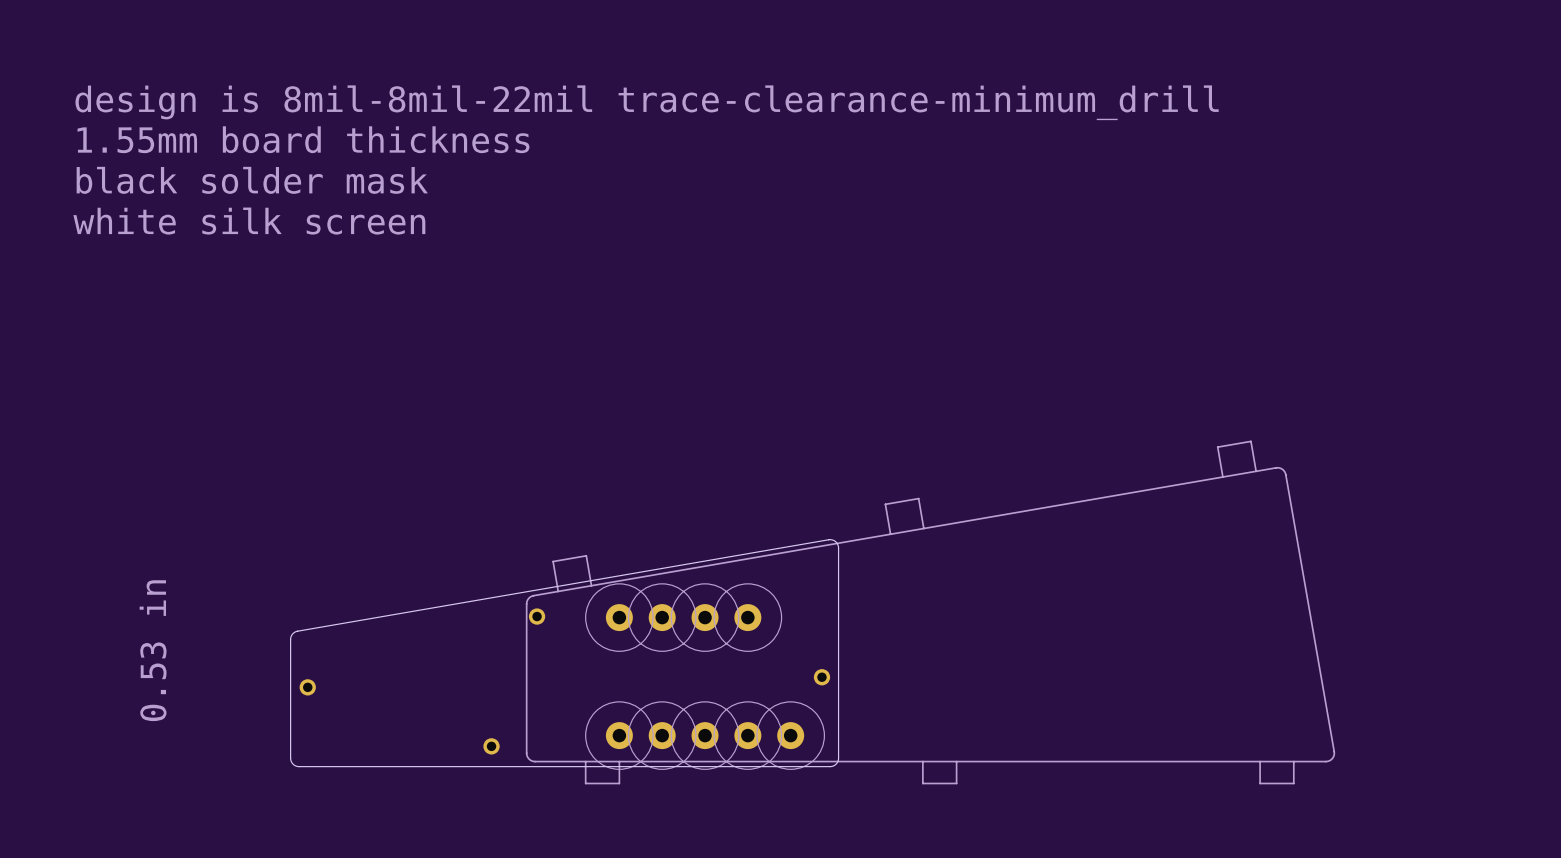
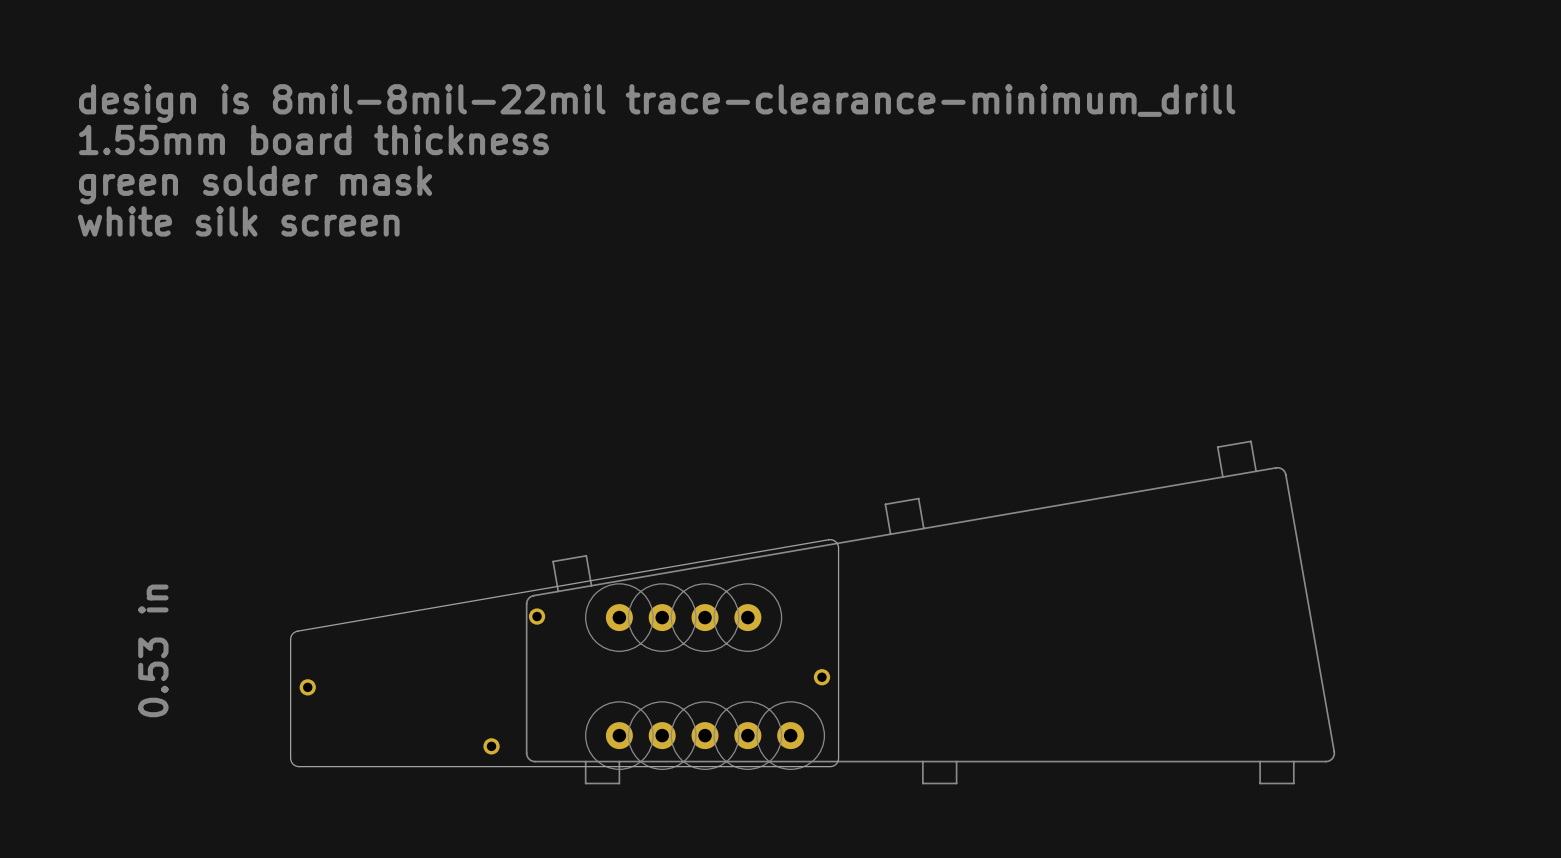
text: black solder mask (252, 180) -> green solder mask (255, 184)

